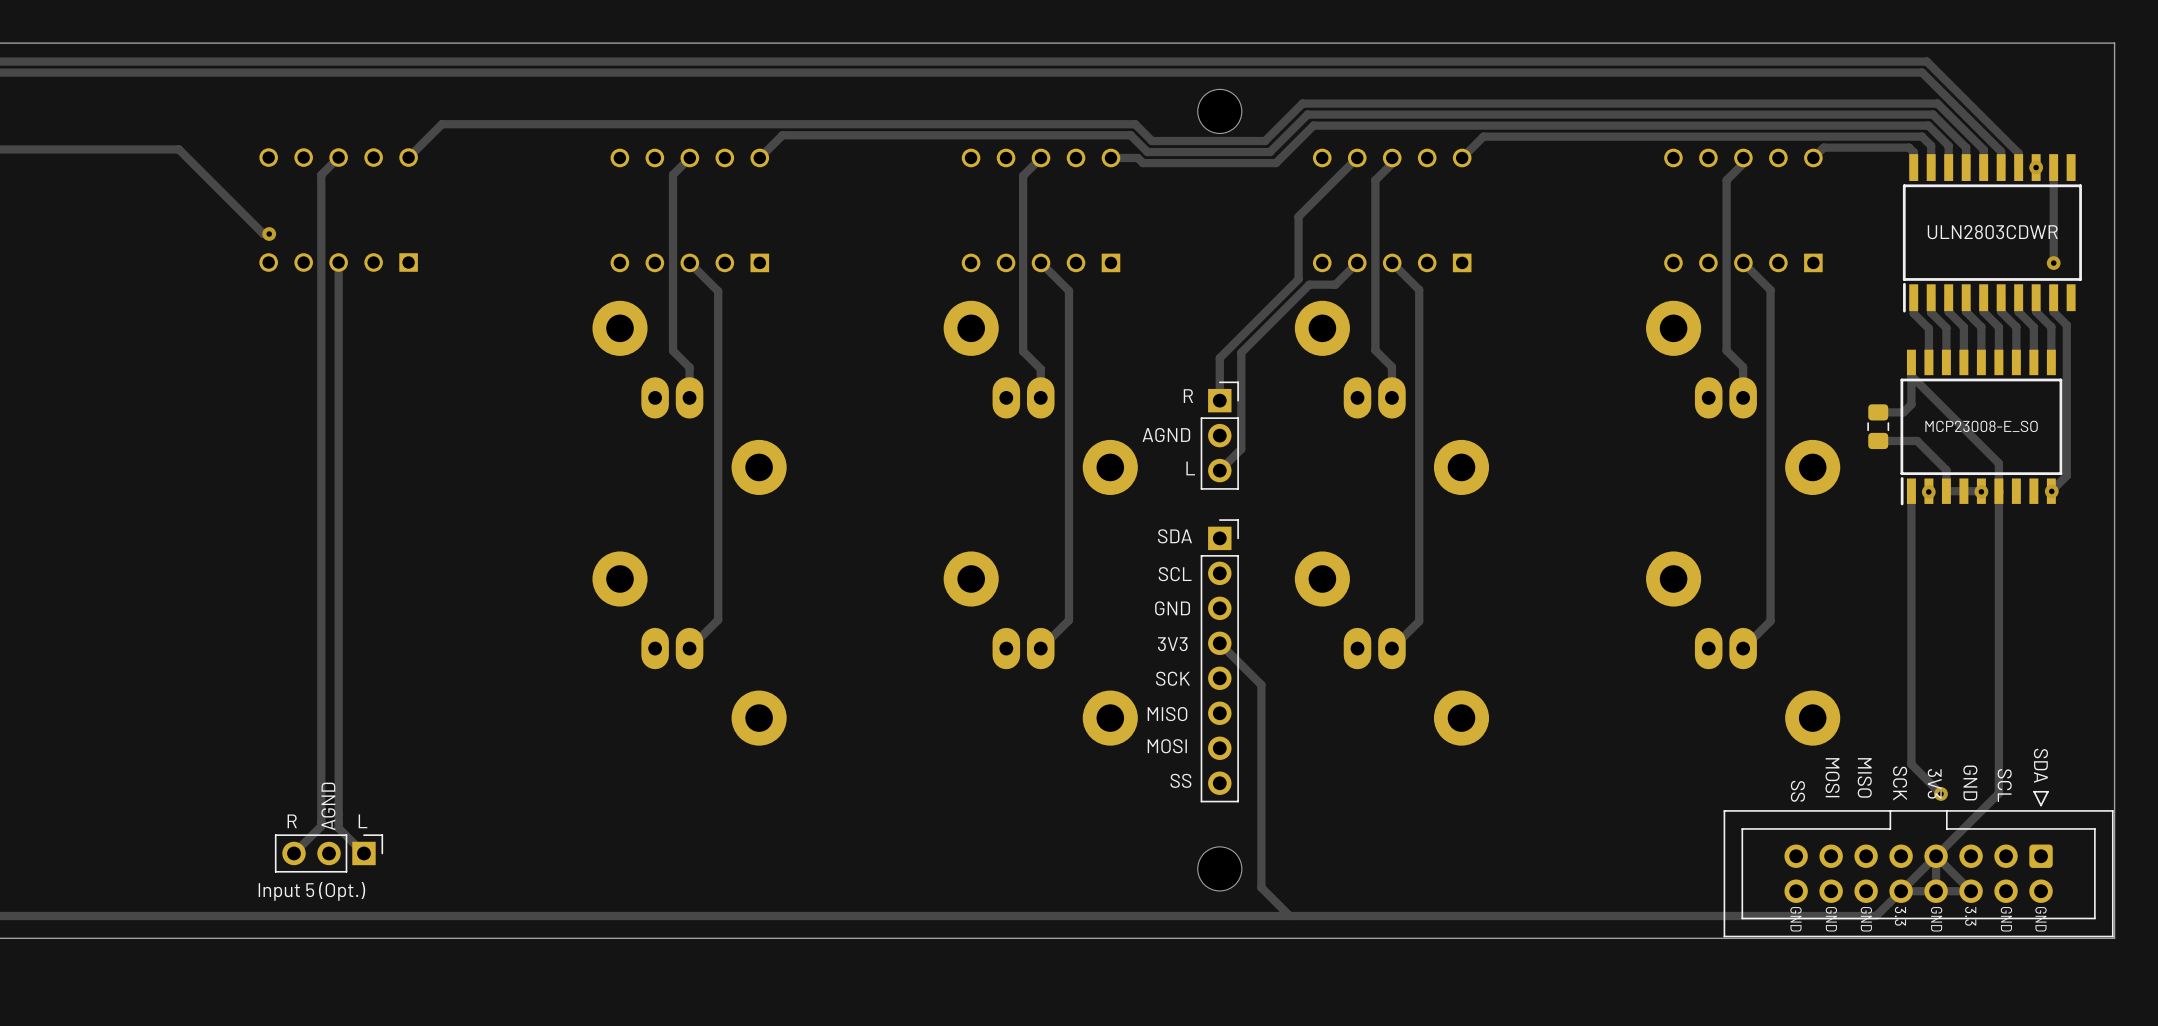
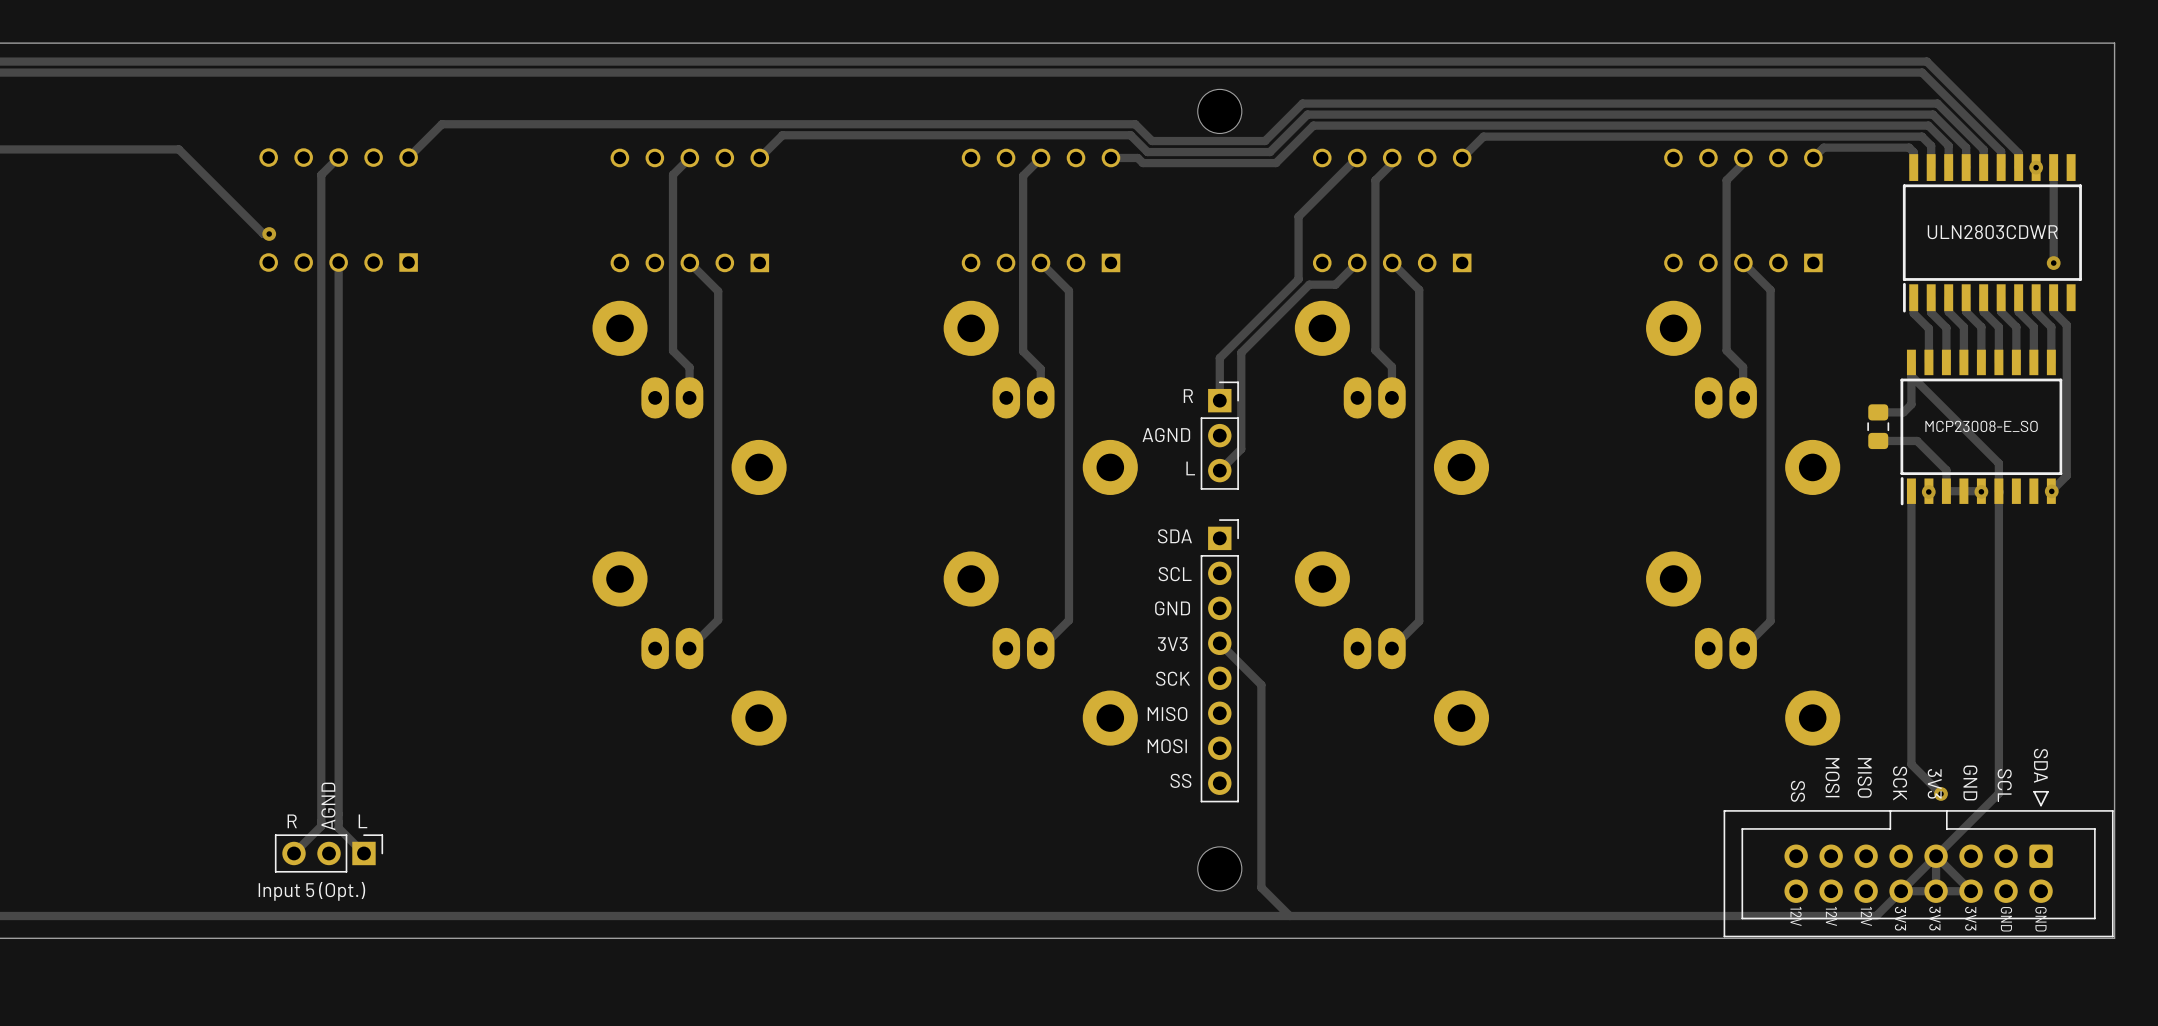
text: 3.3 (1900, 916) -> 3V3 (1900, 918)
text: 3.3 (1970, 916) -> 3V3 (1970, 918)
text: GND (1795, 919) -> 12V (1796, 916)
text: GND (1831, 919) -> 12V (1831, 916)
text: GND (1866, 919) -> 12V (1866, 916)
text: GND (1936, 919) -> 3V3 (1934, 918)

